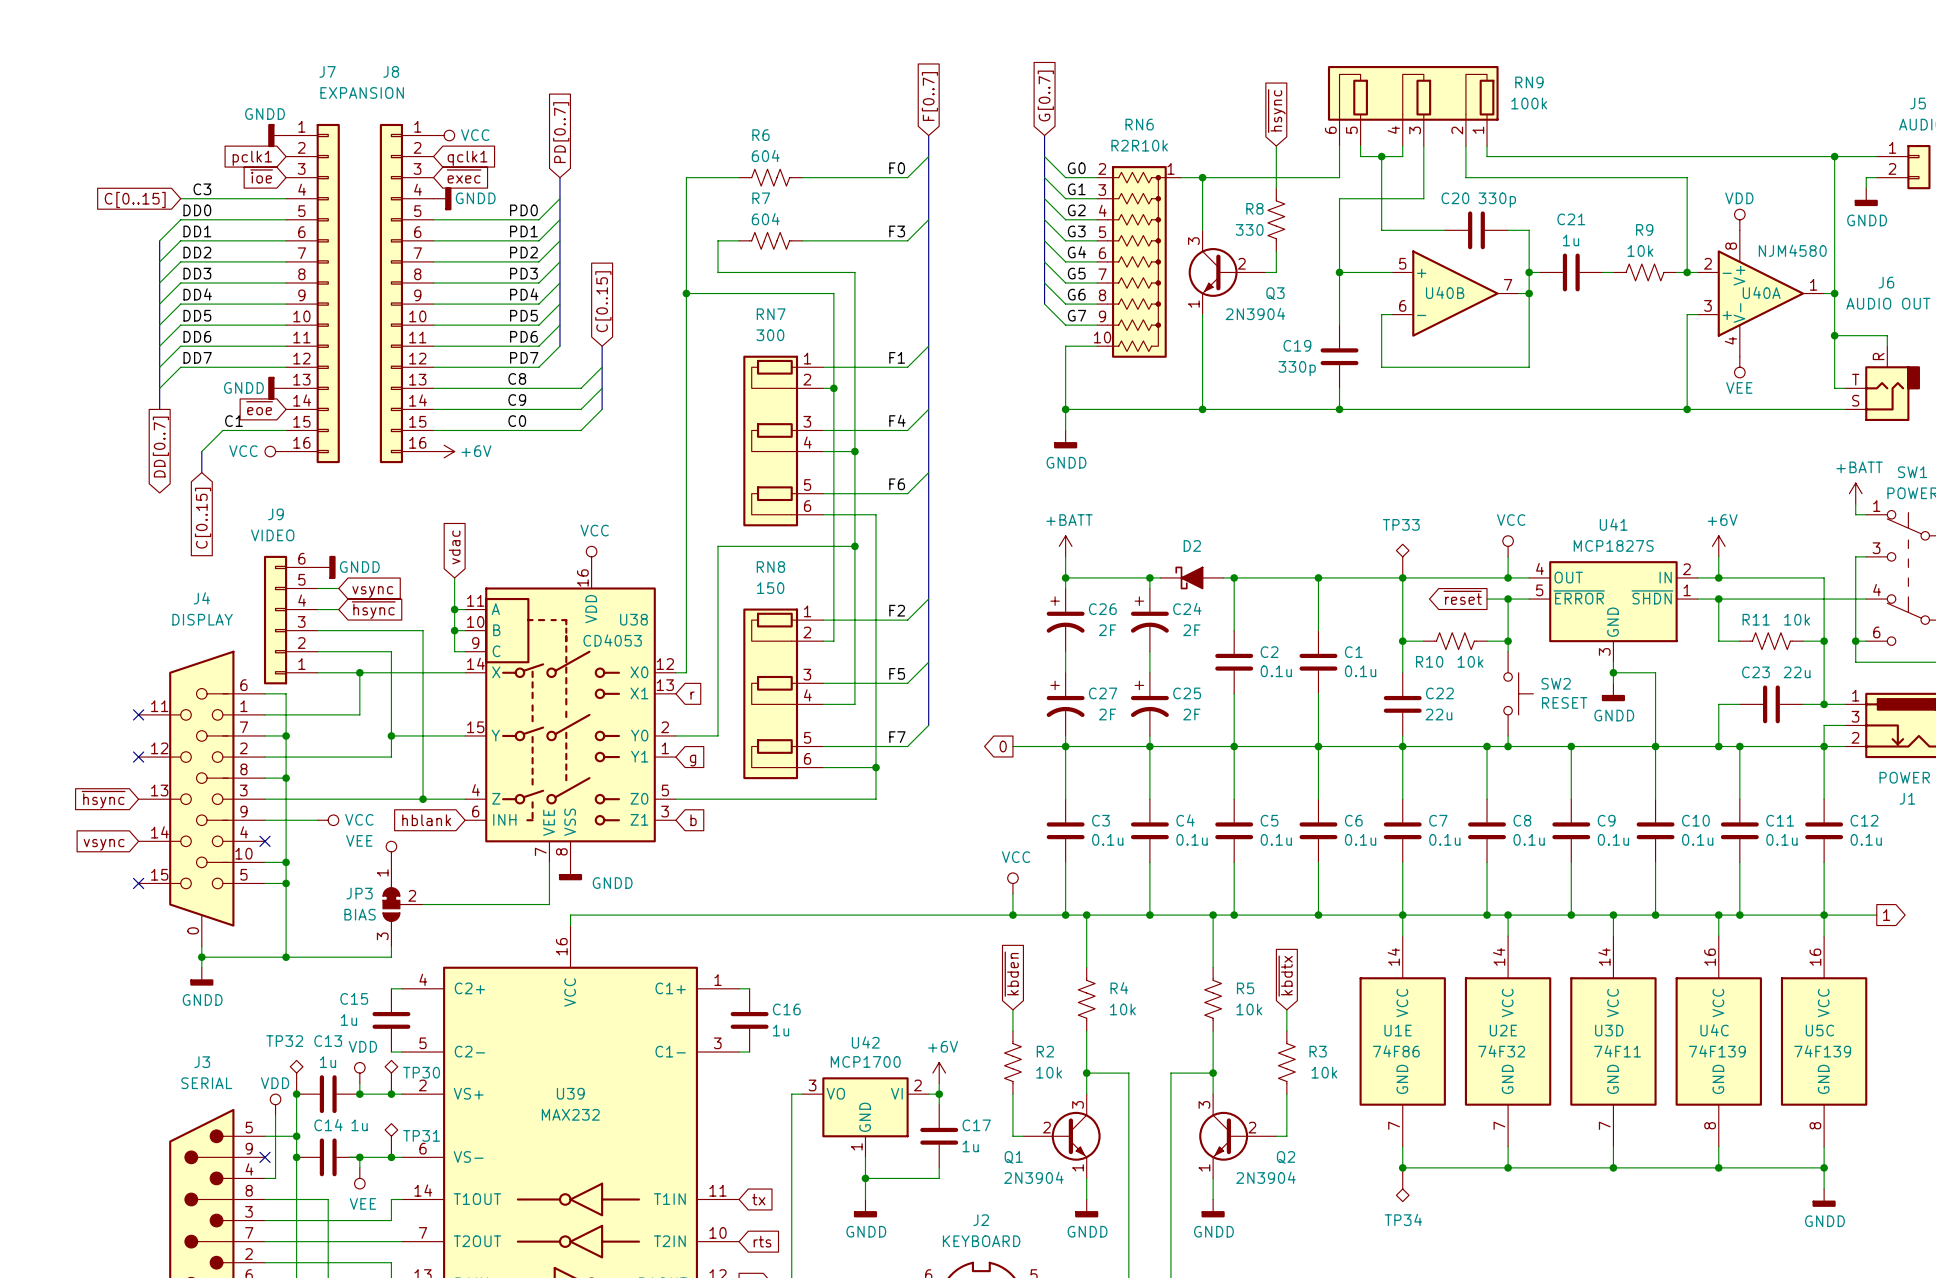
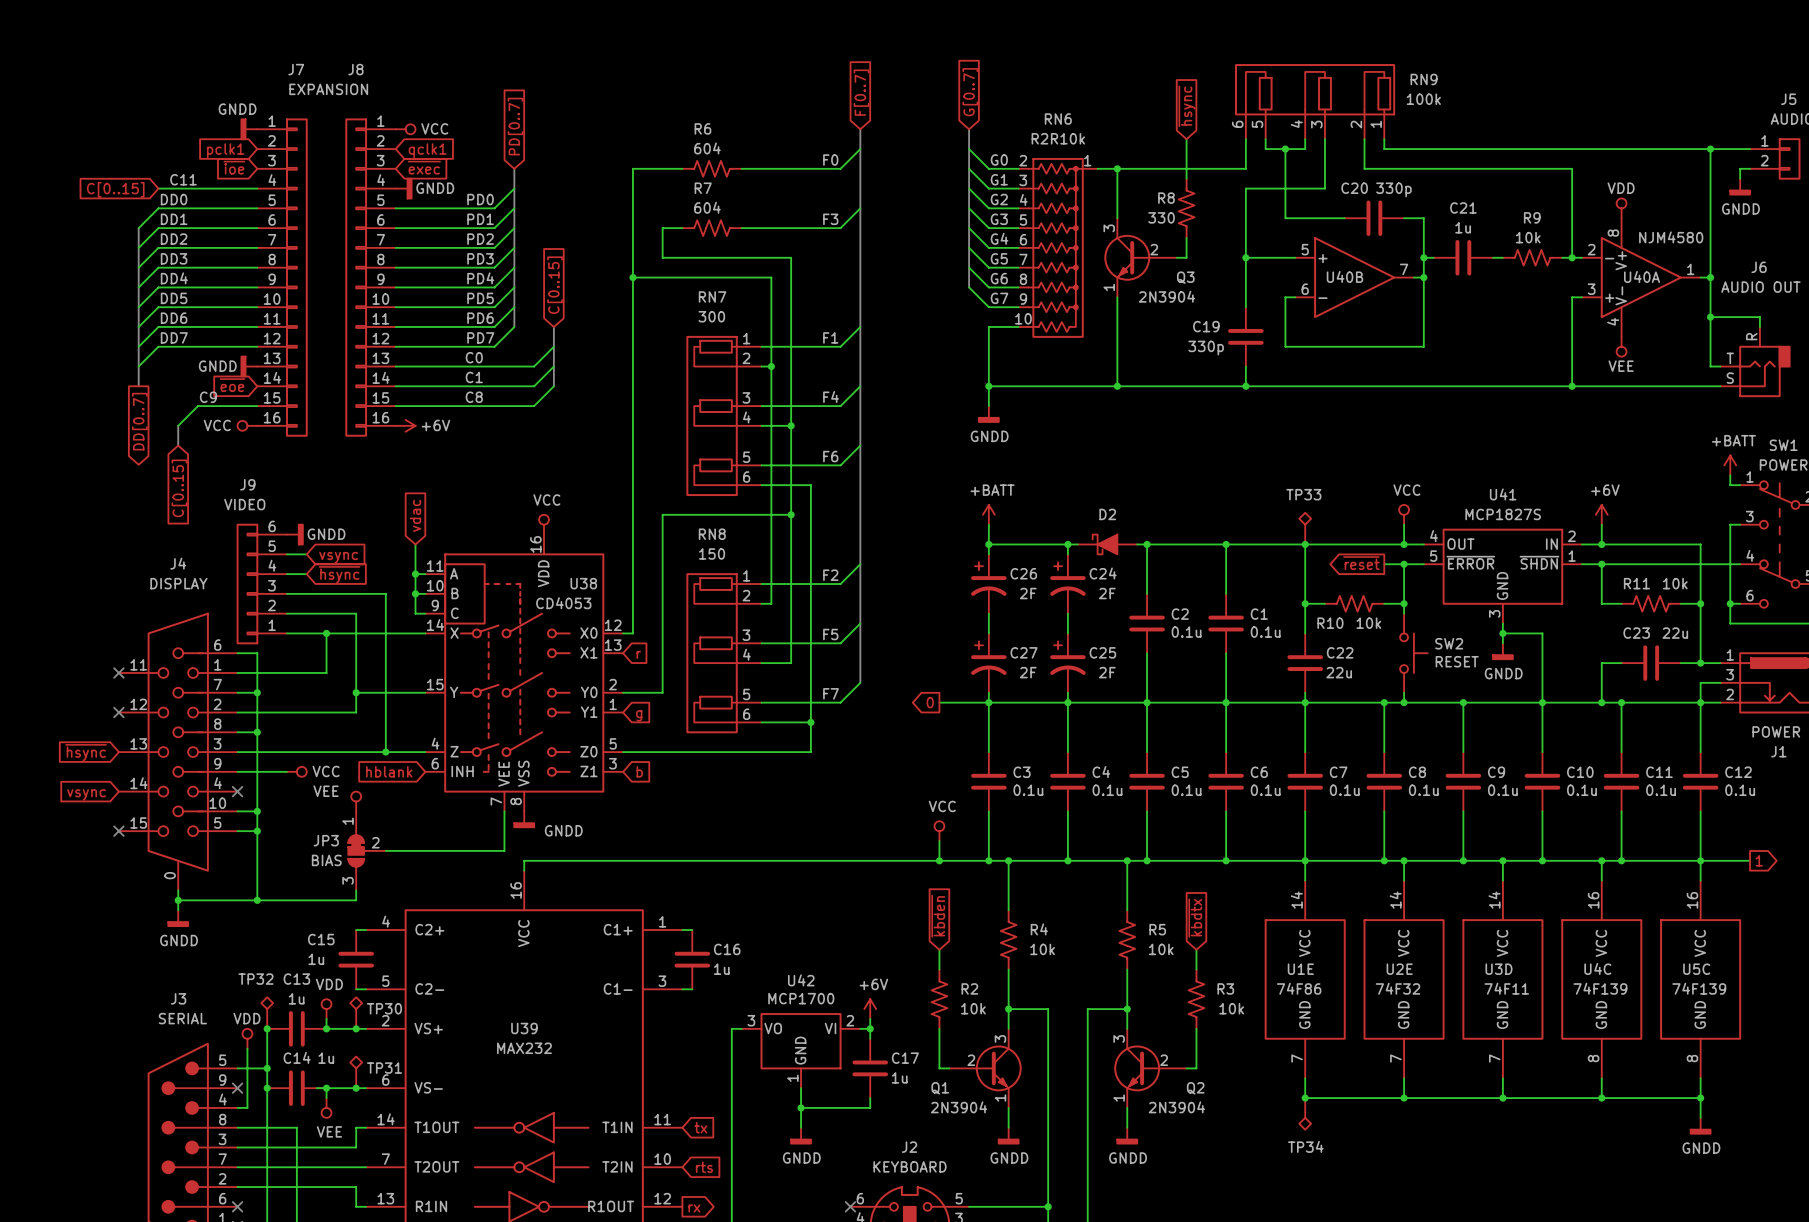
label: C3 (202, 189) -> C11 (183, 179)
label: C8 (517, 378) -> C0 (474, 357)
label: C9 (517, 400) -> C1 (474, 377)
label: C1 (233, 421) -> C9 (208, 397)
label: C0 (517, 421) -> C8 (474, 397)

